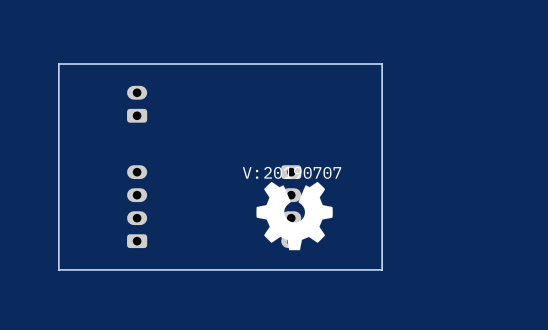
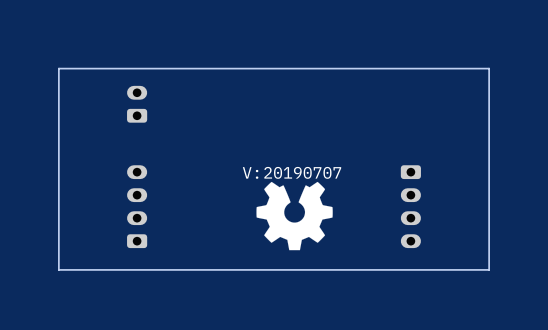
board edge: (58, 68) (58, 64) (382, 64) (382, 269) -> (58, 68) (489, 68) (489, 269) (382, 269)
part position: (291, 206) -> (410, 206)

